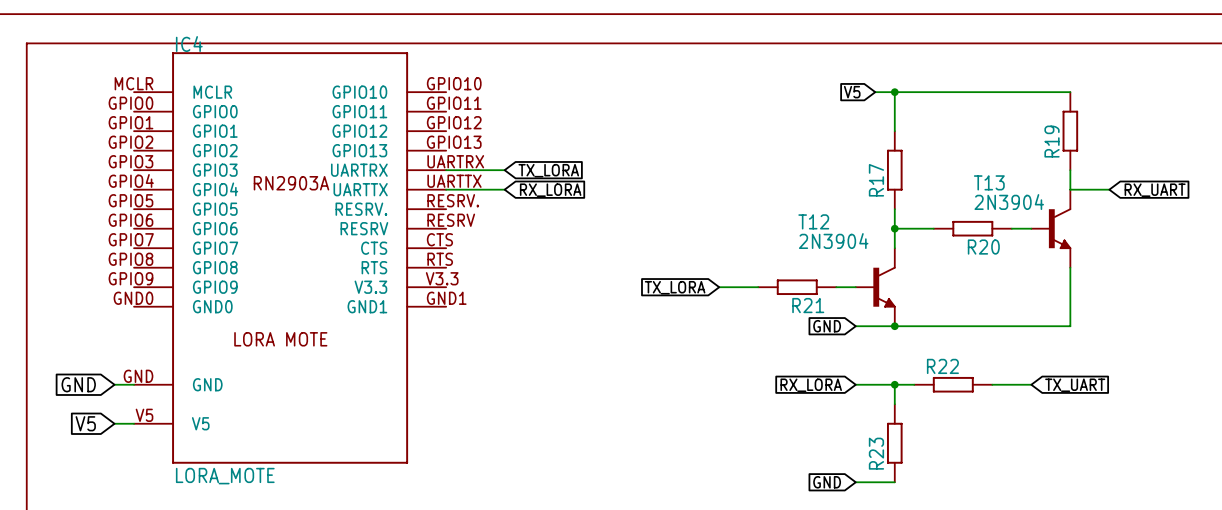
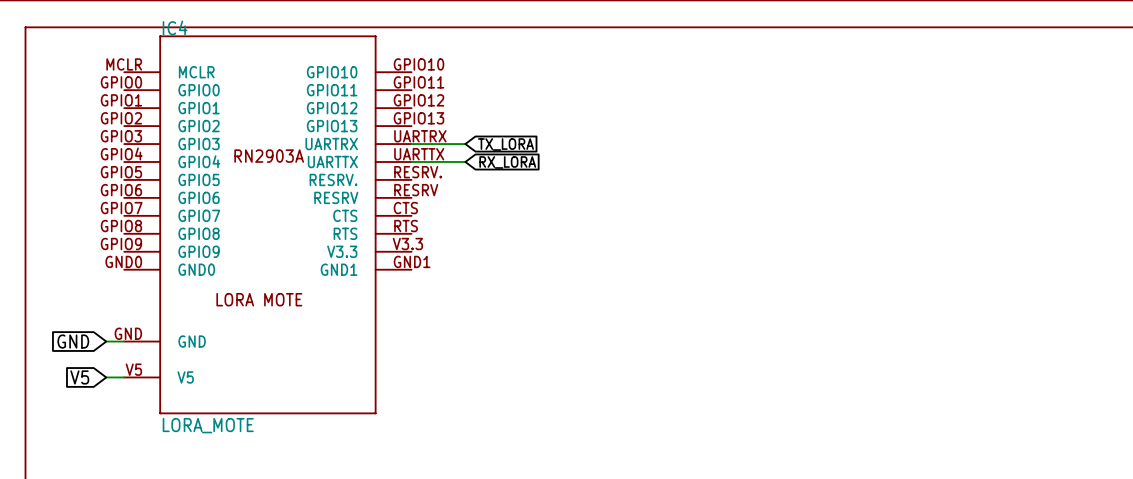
global label: V5 (852, 92) -> none
wire: (875, 92) (1070, 92) -> none
wire: (894, 92) (894, 131) -> none
junction: (894, 92) -> none
R19: (1070, 131) -> none
R17: (894, 170) -> none
wire: (1070, 170) (1070, 189) (1109, 189) -> none
global label: RX_UART (1155, 190) -> none
wire: (894, 209) (894, 248) -> none
wire: (894, 228) (933, 228) -> none
junction: (894, 228) -> none
R20: (972, 228) -> none
wire: (1011, 228) (1031, 228) -> none
T13: 2N3904 (1051, 228) -> none
wire: (1070, 267) (1070, 326) (855, 326) -> none
global label: TX_LORA (675, 287) -> none
wire: (719, 287) (758, 287) -> none
R21: (797, 287) -> none
wire: (836, 287) (855, 287) -> none
T12: 2N3904 (875, 287) -> none
global label: GND (827, 326) -> none
junction: (894, 326) -> none
wire: (855, 384) (914, 384) -> none
wire: (894, 384) (894, 404) -> none
junction: (894, 384) -> none
R22: (953, 384) -> none
wire: (992, 384) (1031, 384) -> none
global label: RX_LORA (811, 385) -> none
global label: TX_UART (1075, 385) -> none
R23: (894, 443) -> none
global label: GND (827, 482) -> none
wire: (855, 482) (894, 482) -> none

